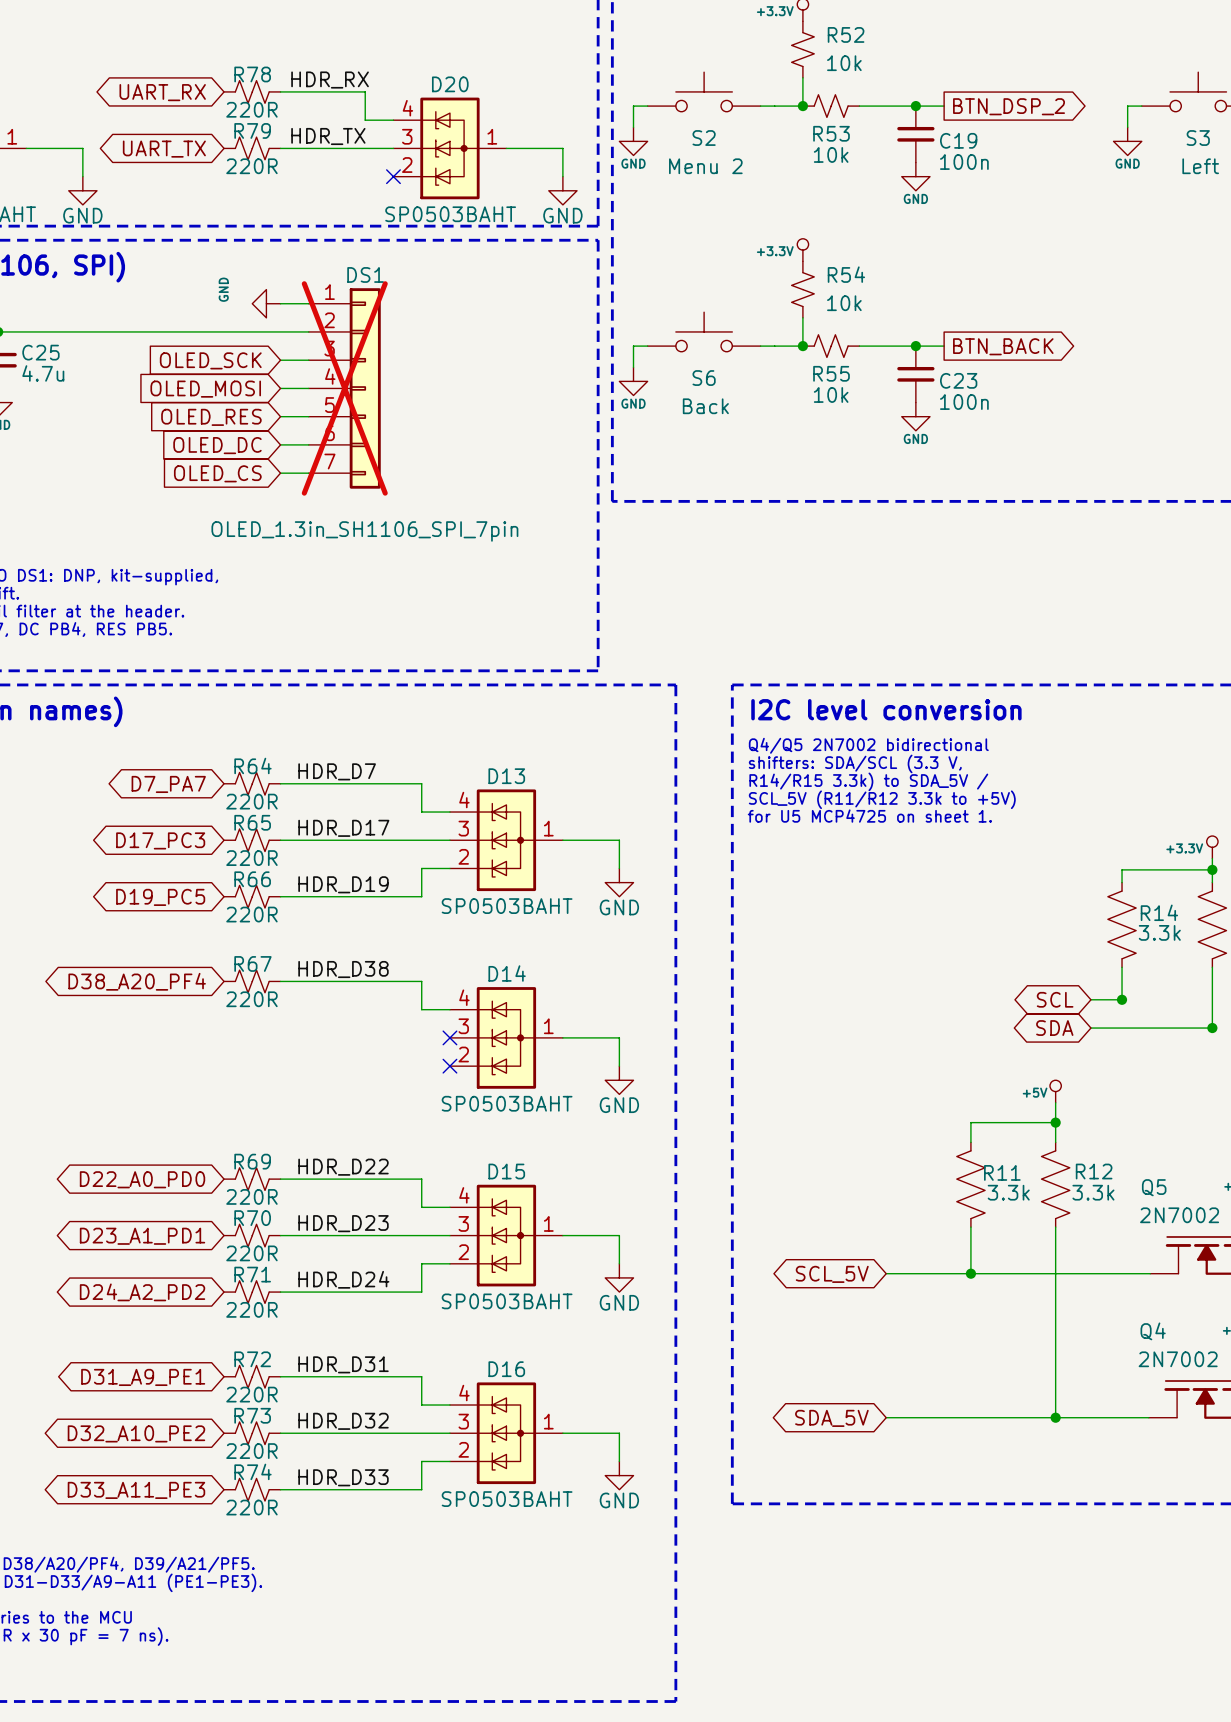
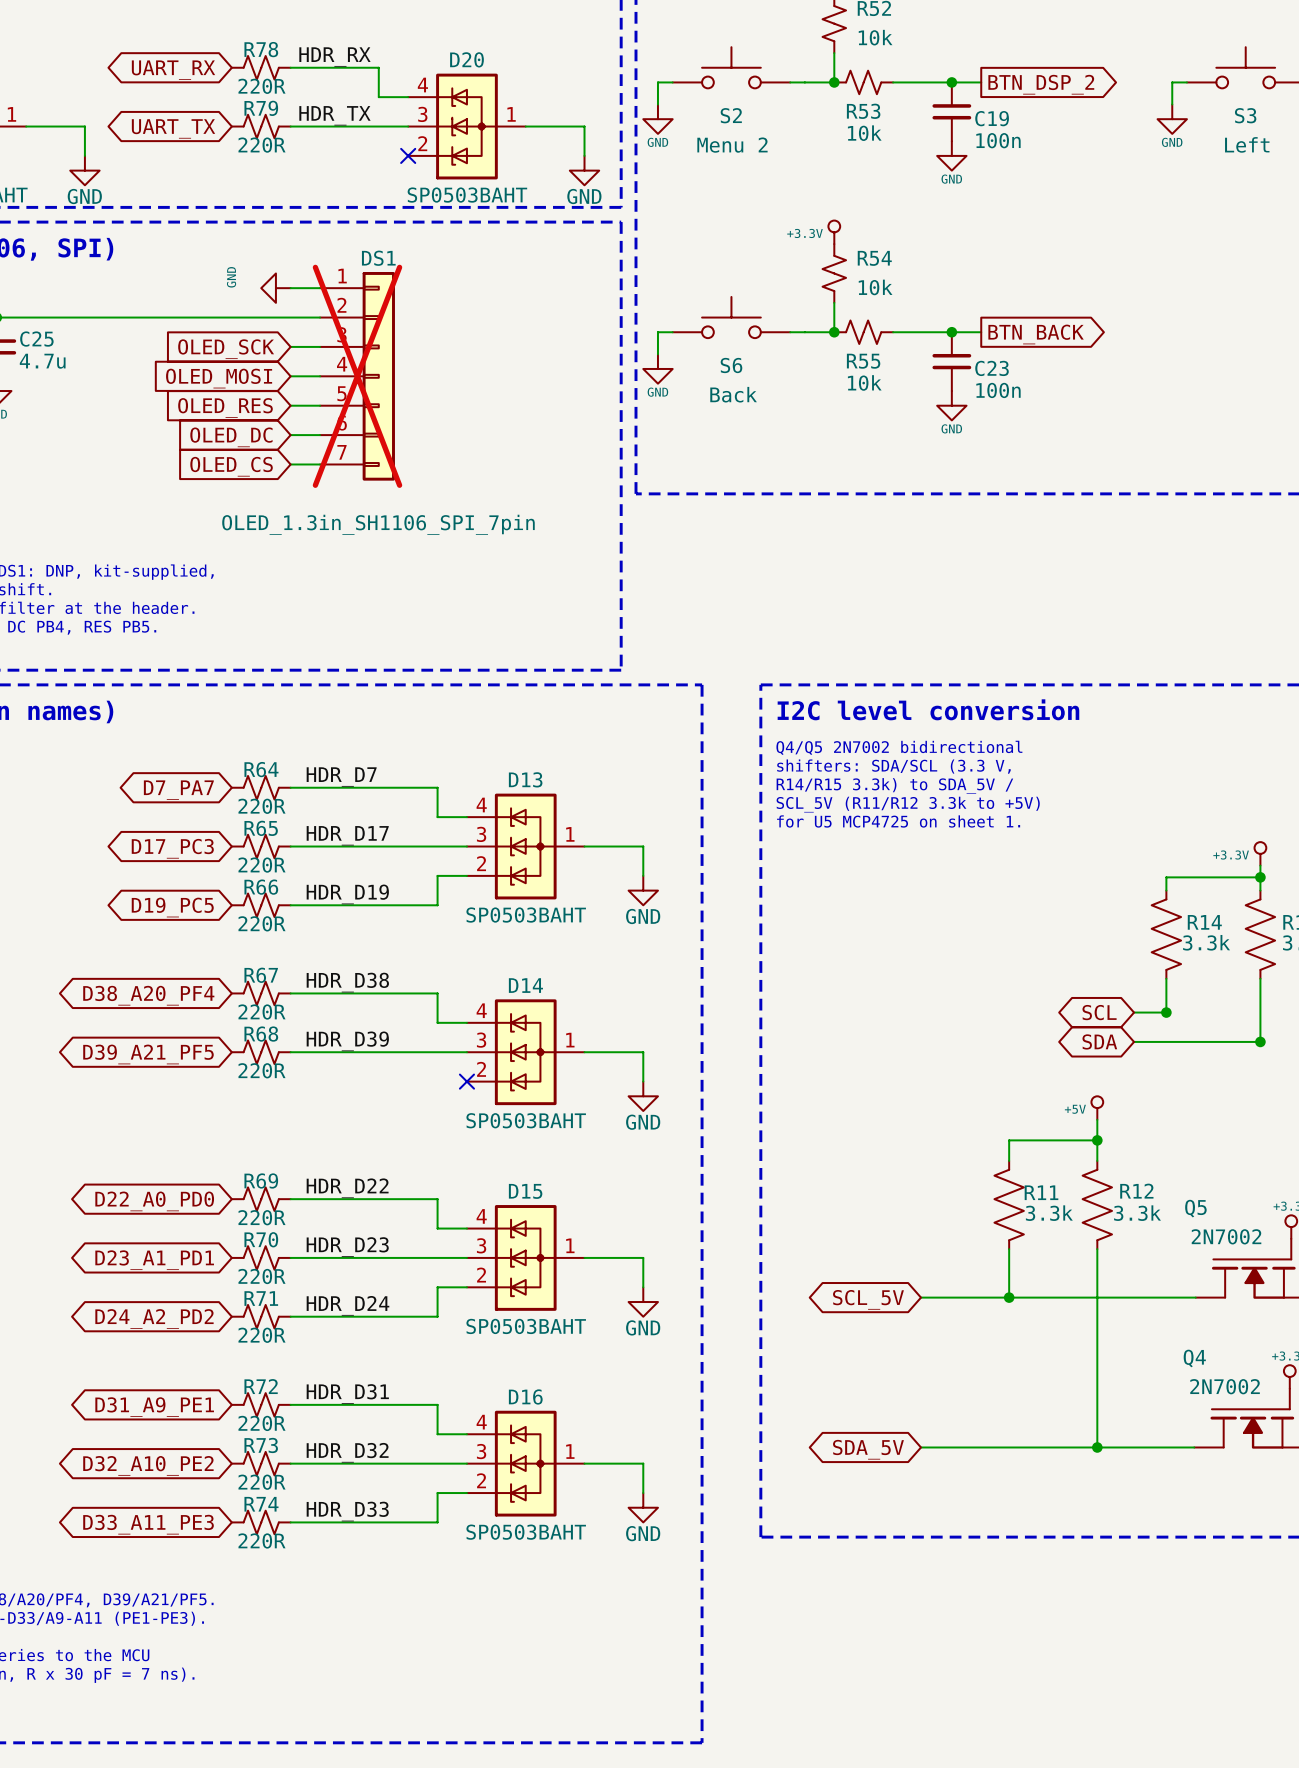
label: none -> HDR_D39 (347, 1041)
R68: none -> 220R (261, 1052)
wire: none -> (290, 1052) (466, 1052)
no-connect mark: (449, 1037) -> none
global label: none -> D39_A21_PF5 (148, 1054)

